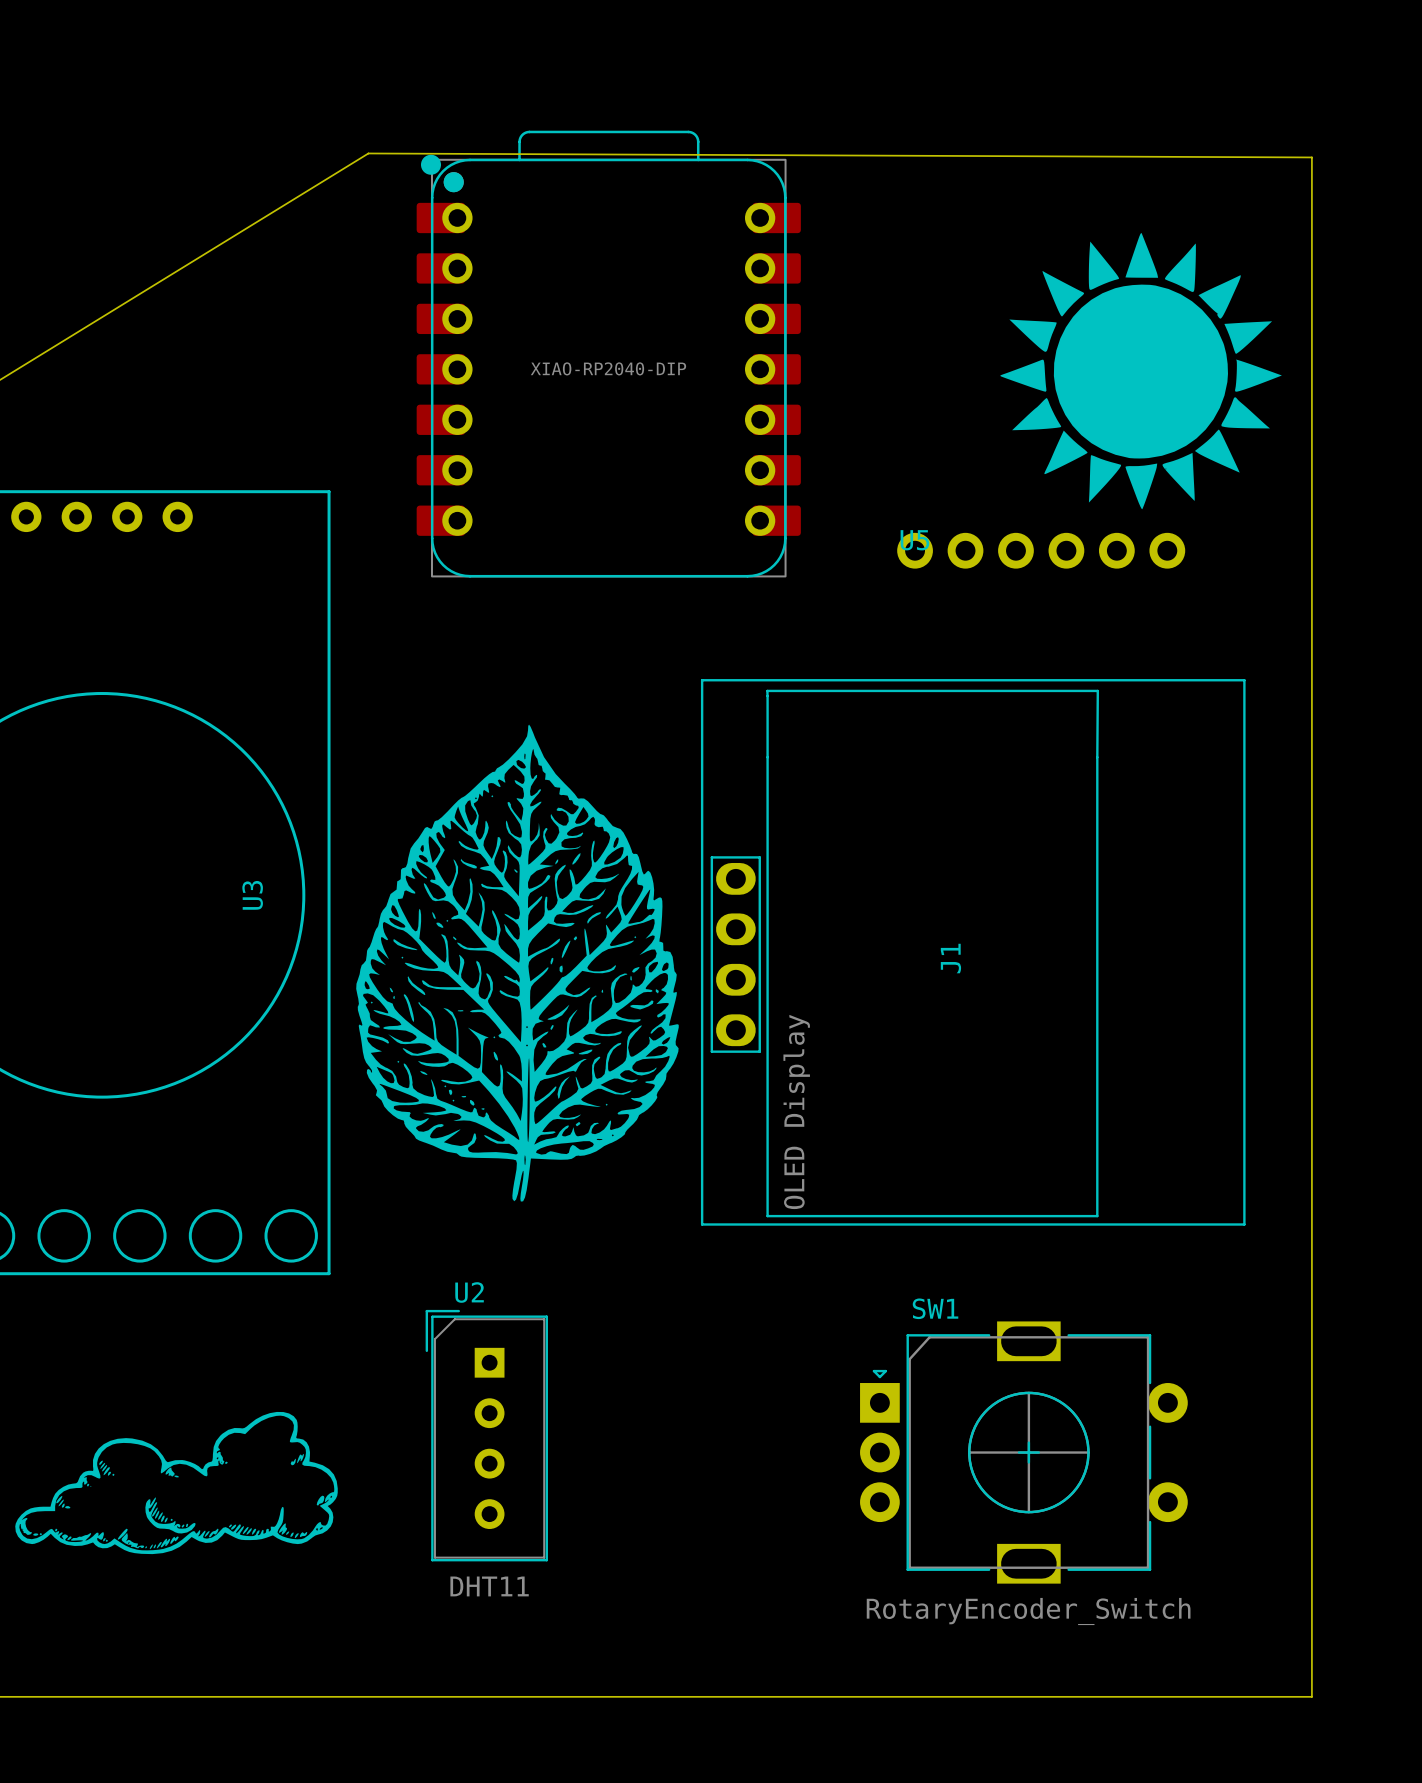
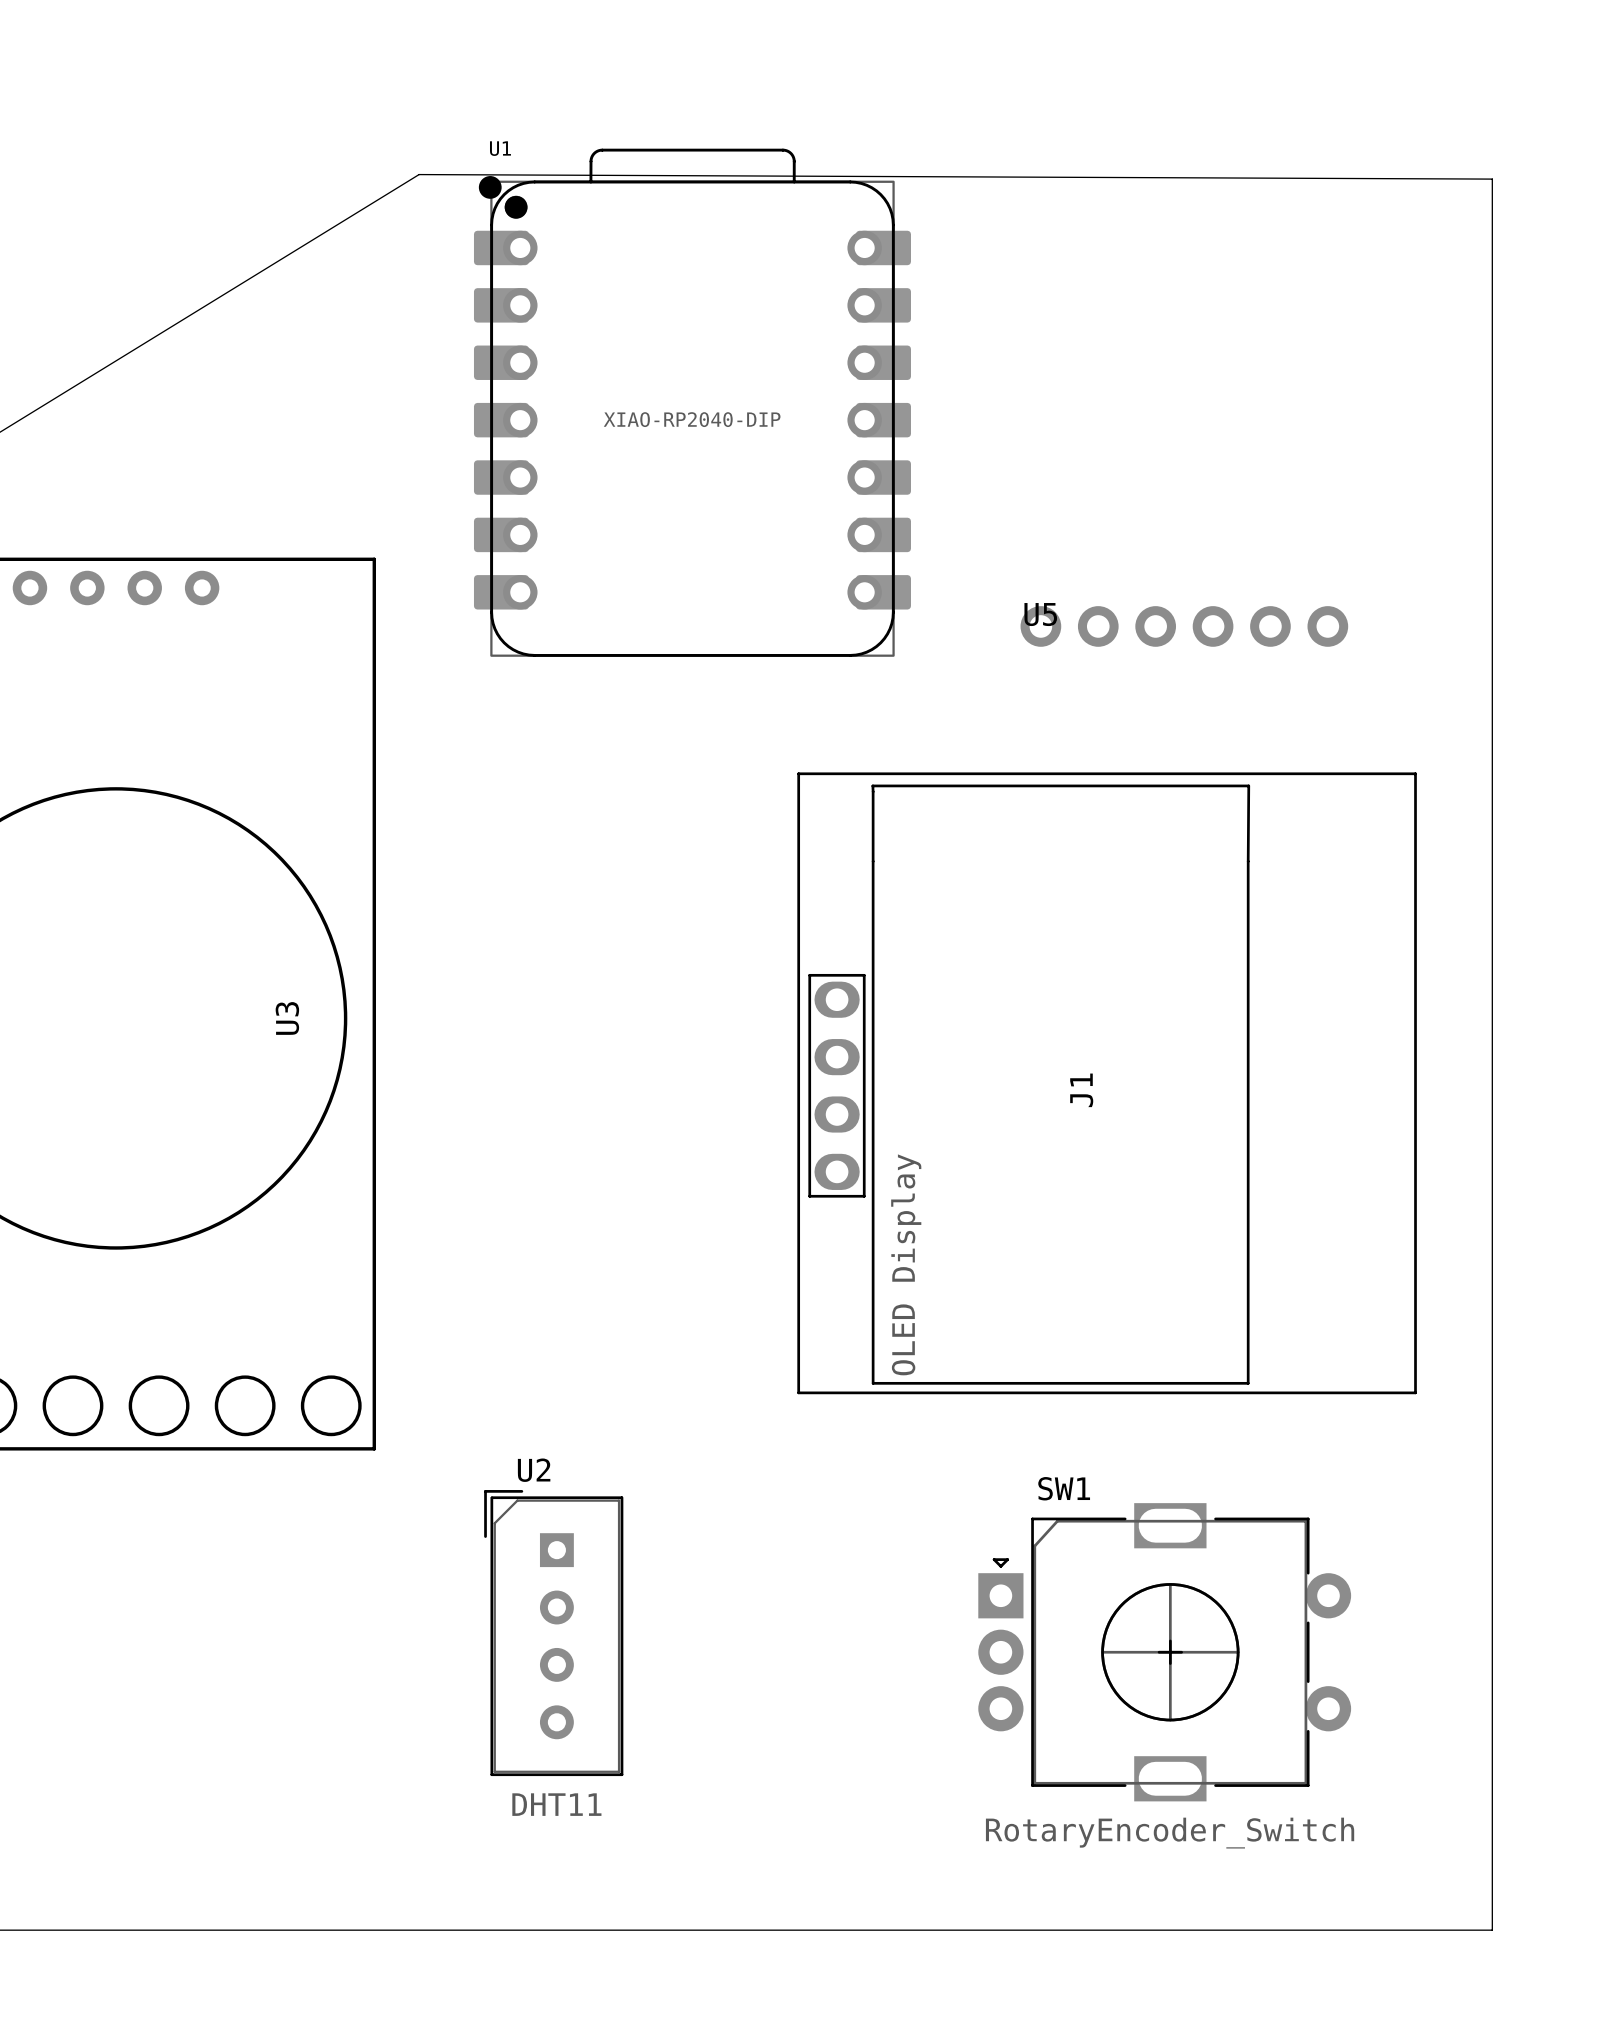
U1 name: none -> U1 (500, 148)
part: (1141, 371) -> none
drawing: [356, 724, 679, 1202] -> none
drawing: [15, 1411, 338, 1555] -> none

